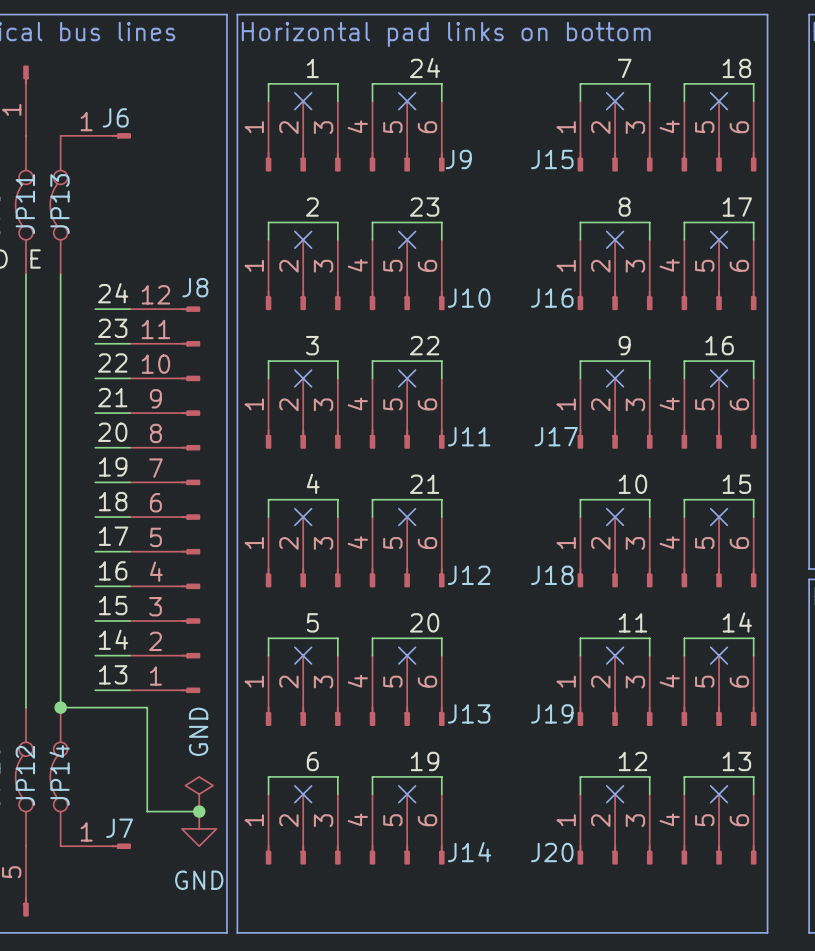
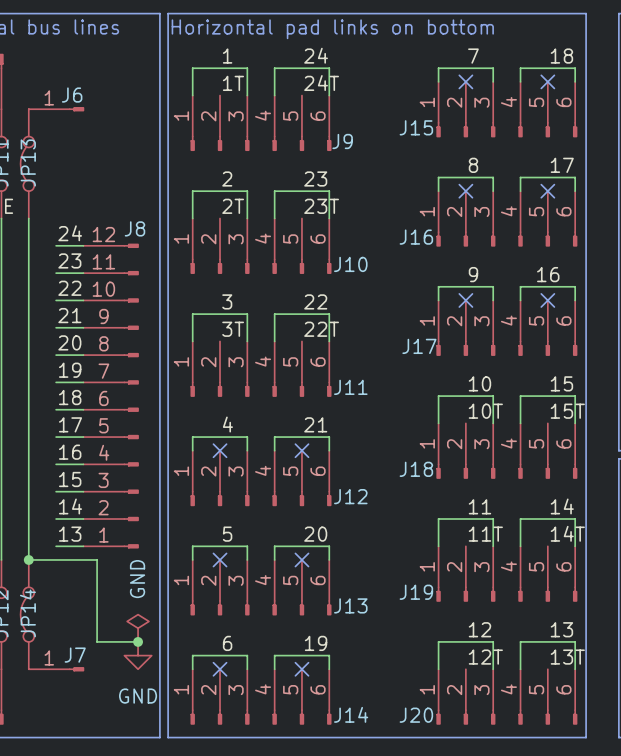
no-connect mark: (303, 101) -> none
no-connect mark: (407, 101) -> none
label: none -> 24T (321, 83)
label: none -> 1T (233, 83)
J9 position: (355, 136) -> (260, 123)
label position: 2 (312, 207) -> 2 (227, 178)
label position: 23 (424, 207) -> 23 (315, 178)
wire: (268, 239) (268, 222) (337, 222) (337, 239) -> none
no-connect mark: (303, 239) -> none
wire: (372, 239) (372, 222) (441, 222) (441, 239) -> none
no-connect mark: (407, 239) -> none
label: none -> 2T (233, 206)
label: none -> 23T (321, 206)
wire: none -> (192, 218) (192, 191) (247, 191) (247, 218)
J10 position: (355, 274) -> (260, 246)
wire: none -> (274, 218) (274, 191) (329, 191) (329, 218)
label position: 3 (312, 345) -> 3 (227, 301)
label position: 22 (424, 345) -> 22 (315, 301)
wire: (268, 378) (268, 361) (337, 361) (337, 378) -> none
no-connect mark: (303, 378) -> none
wire: (372, 378) (372, 361) (441, 361) (441, 378) -> none
no-connect mark: (407, 378) -> none
J11 position: (355, 413) -> (260, 369)
label: none -> 3T (233, 329)
label: none -> 22T (321, 329)
wire: none -> (192, 341) (192, 314) (247, 314) (247, 341)
wire: none -> (274, 341) (274, 314) (329, 314) (329, 341)
label position: 4 (313, 483) -> 4 (227, 424)
label position: 21 (424, 484) -> 21 (315, 424)
wire: (268, 517) (268, 499) (337, 499) (337, 517) -> (192, 450) (192, 437) (247, 437) (247, 450)
no-connect mark: (303, 517) -> none
wire: (372, 517) (372, 499) (441, 499) (441, 517) -> (274, 450) (274, 437) (329, 437) (329, 450)
no-connect mark: (407, 517) -> none
no-connect mark: (615, 517) -> none
no-connect mark: (719, 517) -> none
label: none -> 10T (485, 411)
label: none -> 15T (567, 411)
J12 position: (355, 552) -> (260, 478)
J18 position: (667, 552) -> (506, 451)
no-connect mark: none -> (220, 450)
no-connect mark: none -> (301, 450)
label position: 5 (312, 622) -> 5 (227, 534)
label position: 20 (424, 622) -> 20 (315, 534)
label position: 11 (632, 622) -> 11 (479, 506)
label position: 14 (737, 622) -> 14 (562, 506)
wire: (268, 655) (268, 638) (337, 638) (337, 655) -> (192, 559) (192, 546) (247, 546) (247, 559)
no-connect mark: (303, 655) -> none
wire: (372, 655) (372, 638) (441, 638) (441, 655) -> (274, 559) (274, 546) (329, 546) (329, 559)
no-connect mark: (407, 655) -> none
wire: (580, 655) (580, 638) (649, 638) (649, 655) -> none
no-connect mark: (615, 655) -> none
wire: (684, 655) (684, 638) (753, 638) (753, 655) -> none
no-connect mark: (719, 655) -> none
label: none -> 11T (485, 534)
label: none -> 14T (567, 533)
J13 position: (355, 690) -> (260, 587)
wire: none -> (438, 546) (438, 519) (493, 519) (493, 546)
J19 position: (667, 690) -> (506, 574)
wire: none -> (520, 546) (520, 519) (575, 519) (575, 546)
no-connect mark: none -> (220, 559)
no-connect mark: none -> (301, 559)
label position: 6 (312, 761) -> 6 (227, 643)
label position: 19 (425, 761) -> 19 (316, 643)
label position: 12 (632, 761) -> 12 (479, 629)
label position: 13 (736, 761) -> 13 (561, 629)
wire: (268, 794) (268, 776) (337, 776) (337, 794) -> (192, 669) (192, 655) (247, 655) (247, 669)
no-connect mark: (303, 794) -> none
wire: (372, 794) (372, 776) (441, 776) (441, 794) -> (274, 669) (274, 655) (329, 655) (329, 669)
no-connect mark: (407, 794) -> none
wire: (580, 794) (580, 776) (649, 776) (649, 794) -> none
no-connect mark: (615, 794) -> none
wire: (684, 794) (684, 776) (753, 776) (753, 794) -> none
no-connect mark: (719, 794) -> none
J14 position: (355, 829) -> (260, 696)
J20 position: (667, 829) -> (506, 696)
label: none -> 12T (485, 657)
label: none -> 13T (567, 657)
no-connect mark: none -> (220, 669)
no-connect mark: none -> (301, 669)
wire: none -> (438, 669) (438, 641) (493, 641) (493, 669)
wire: none -> (520, 669) (520, 641) (575, 641) (575, 669)

